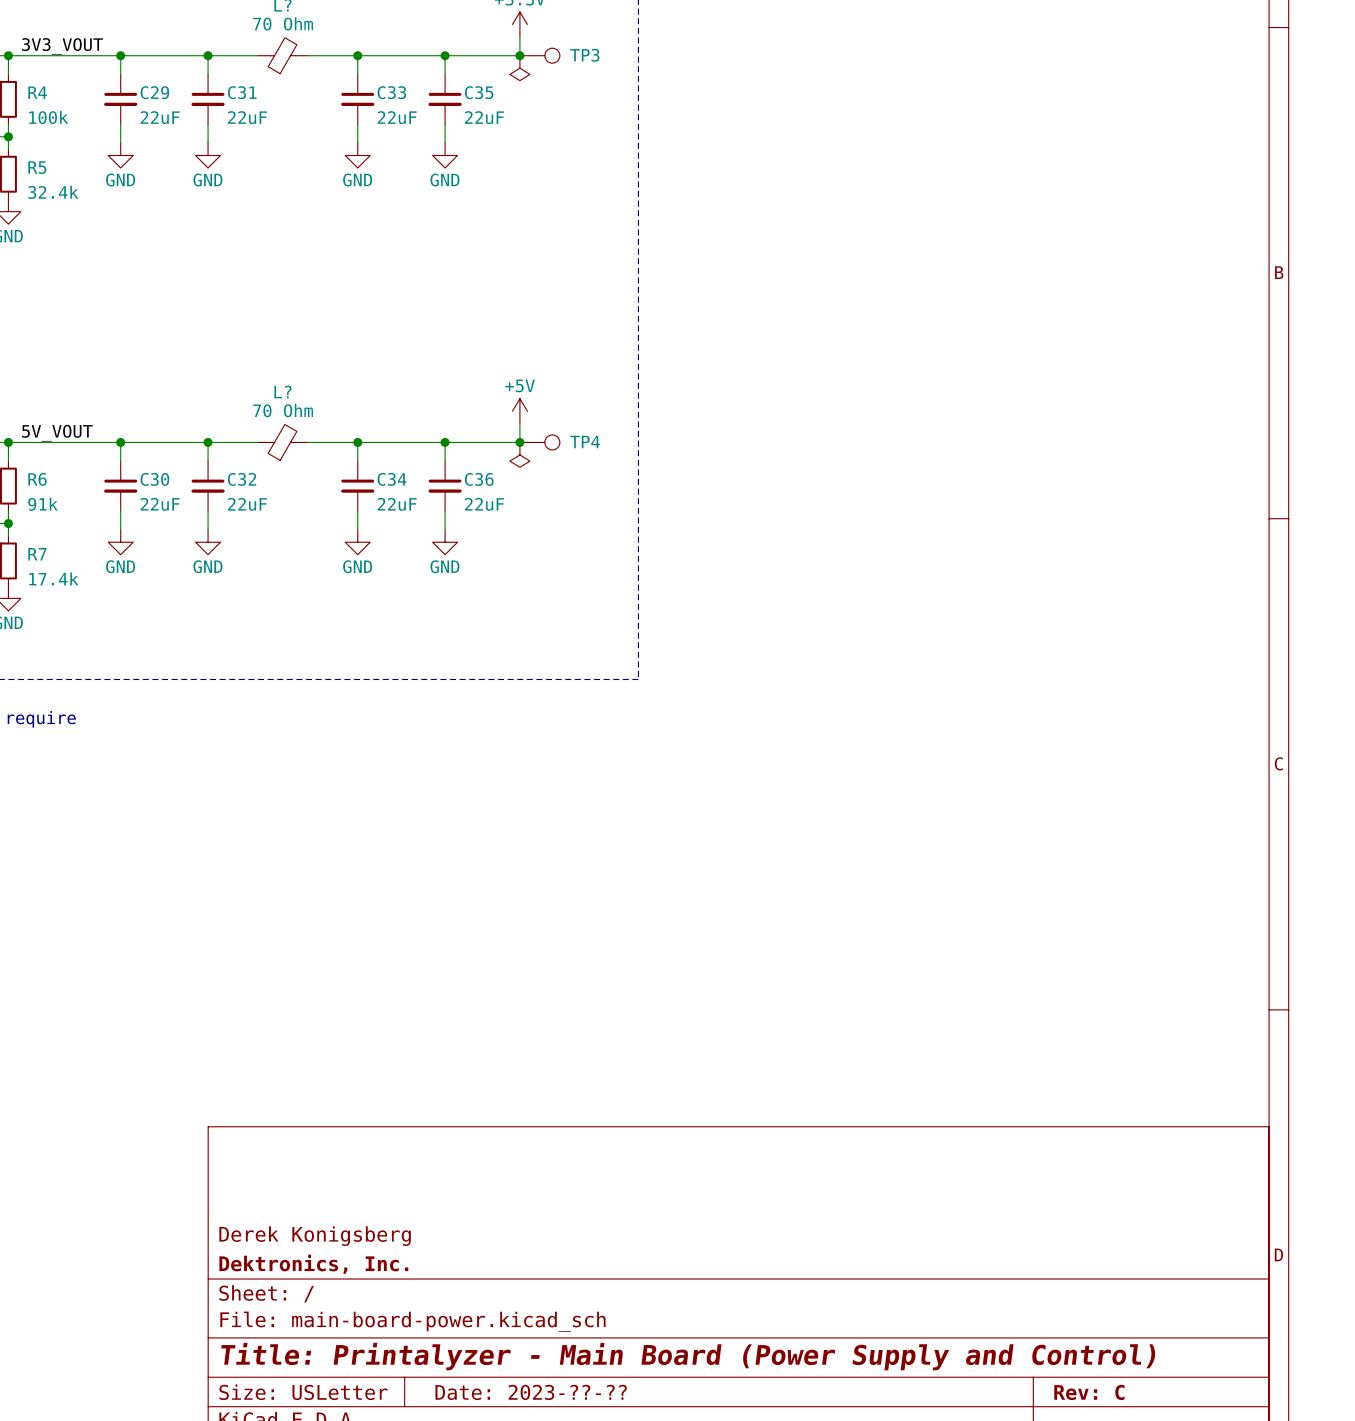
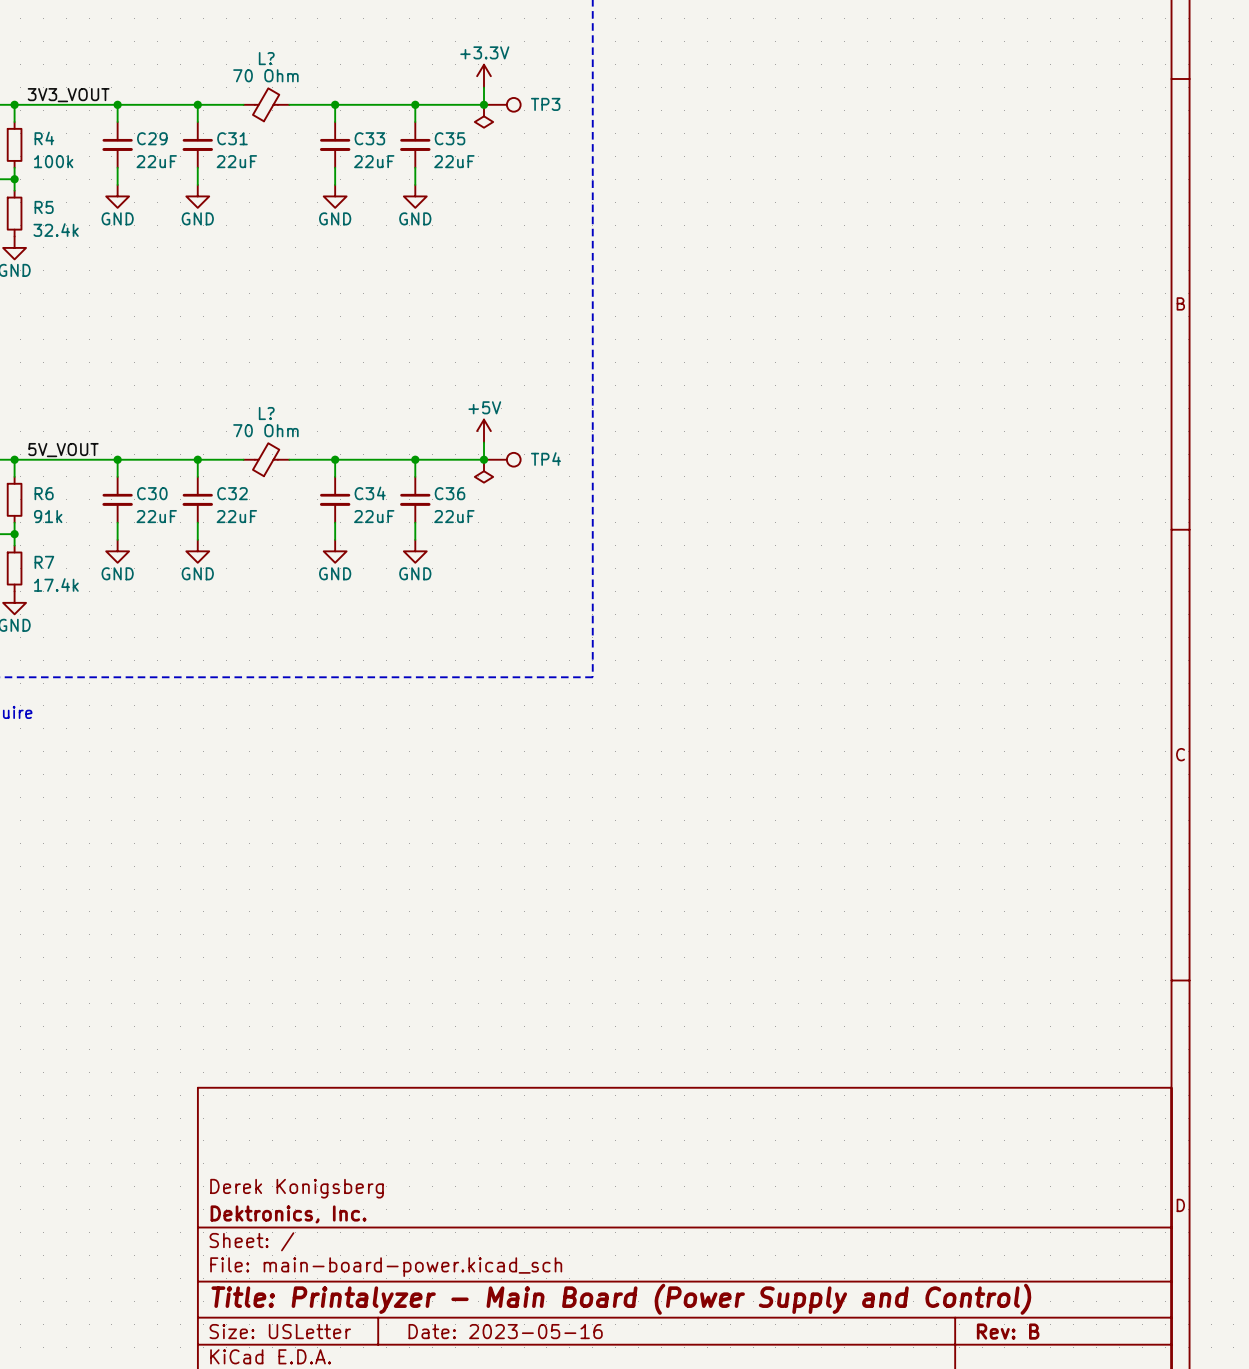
title block: Date: 2023-??-?? (531, 1392) -> Date: 2023-05-16 (505, 1331)
title block: Rev: C (1089, 1392) -> Rev: B (1008, 1331)

